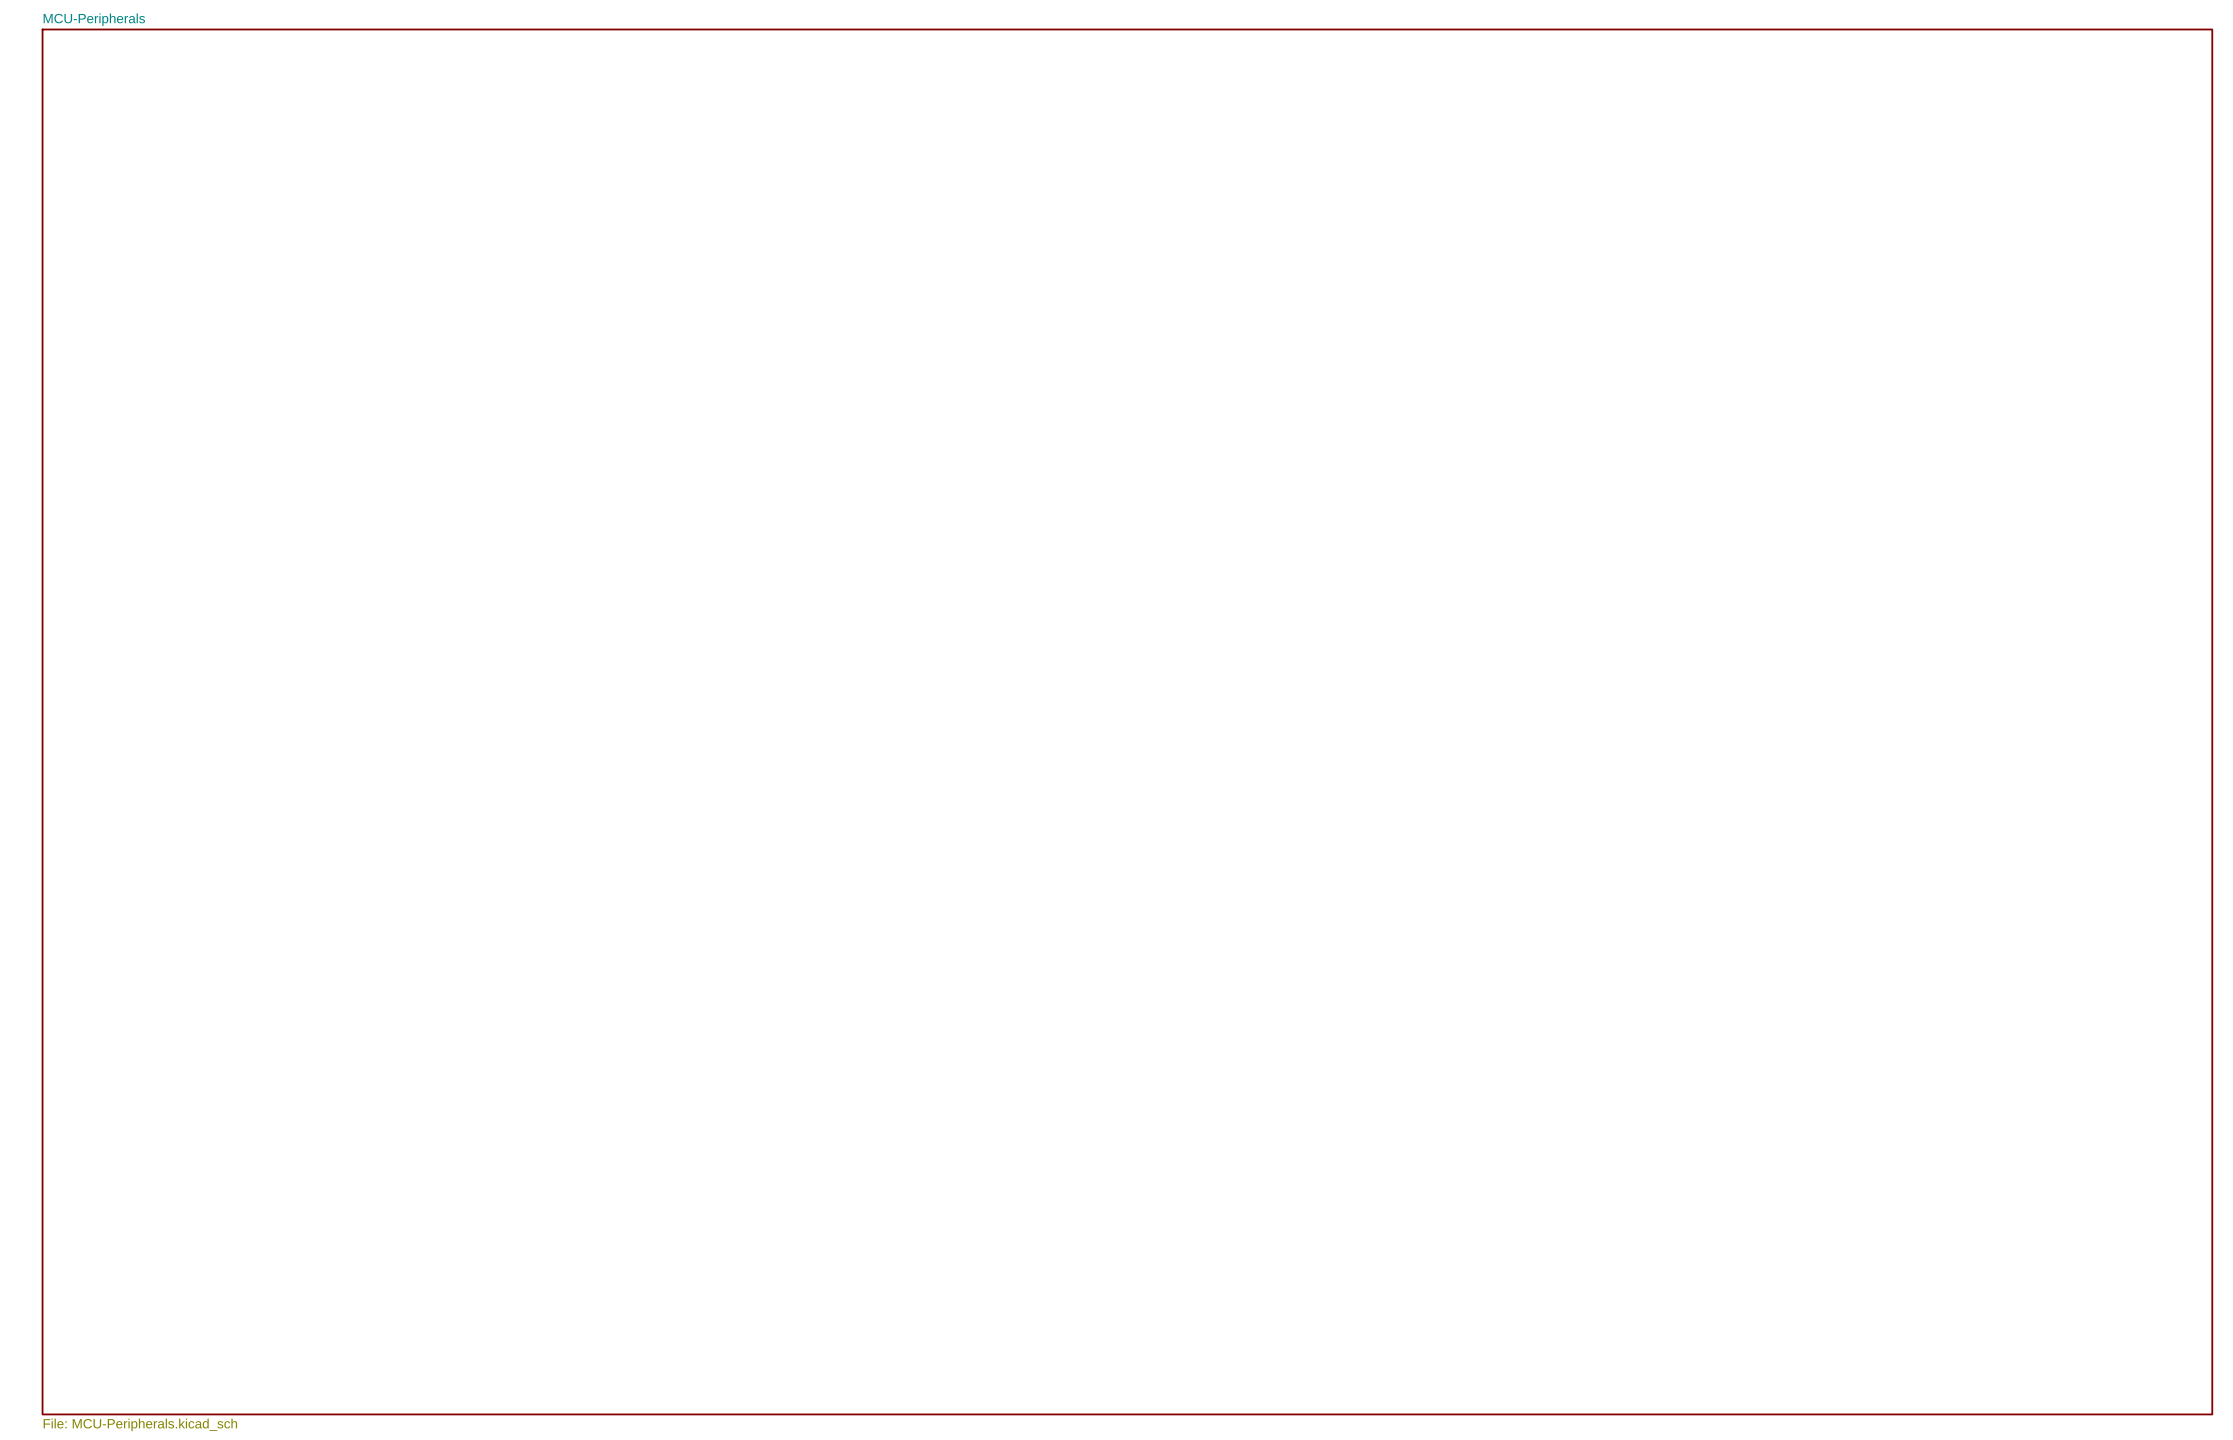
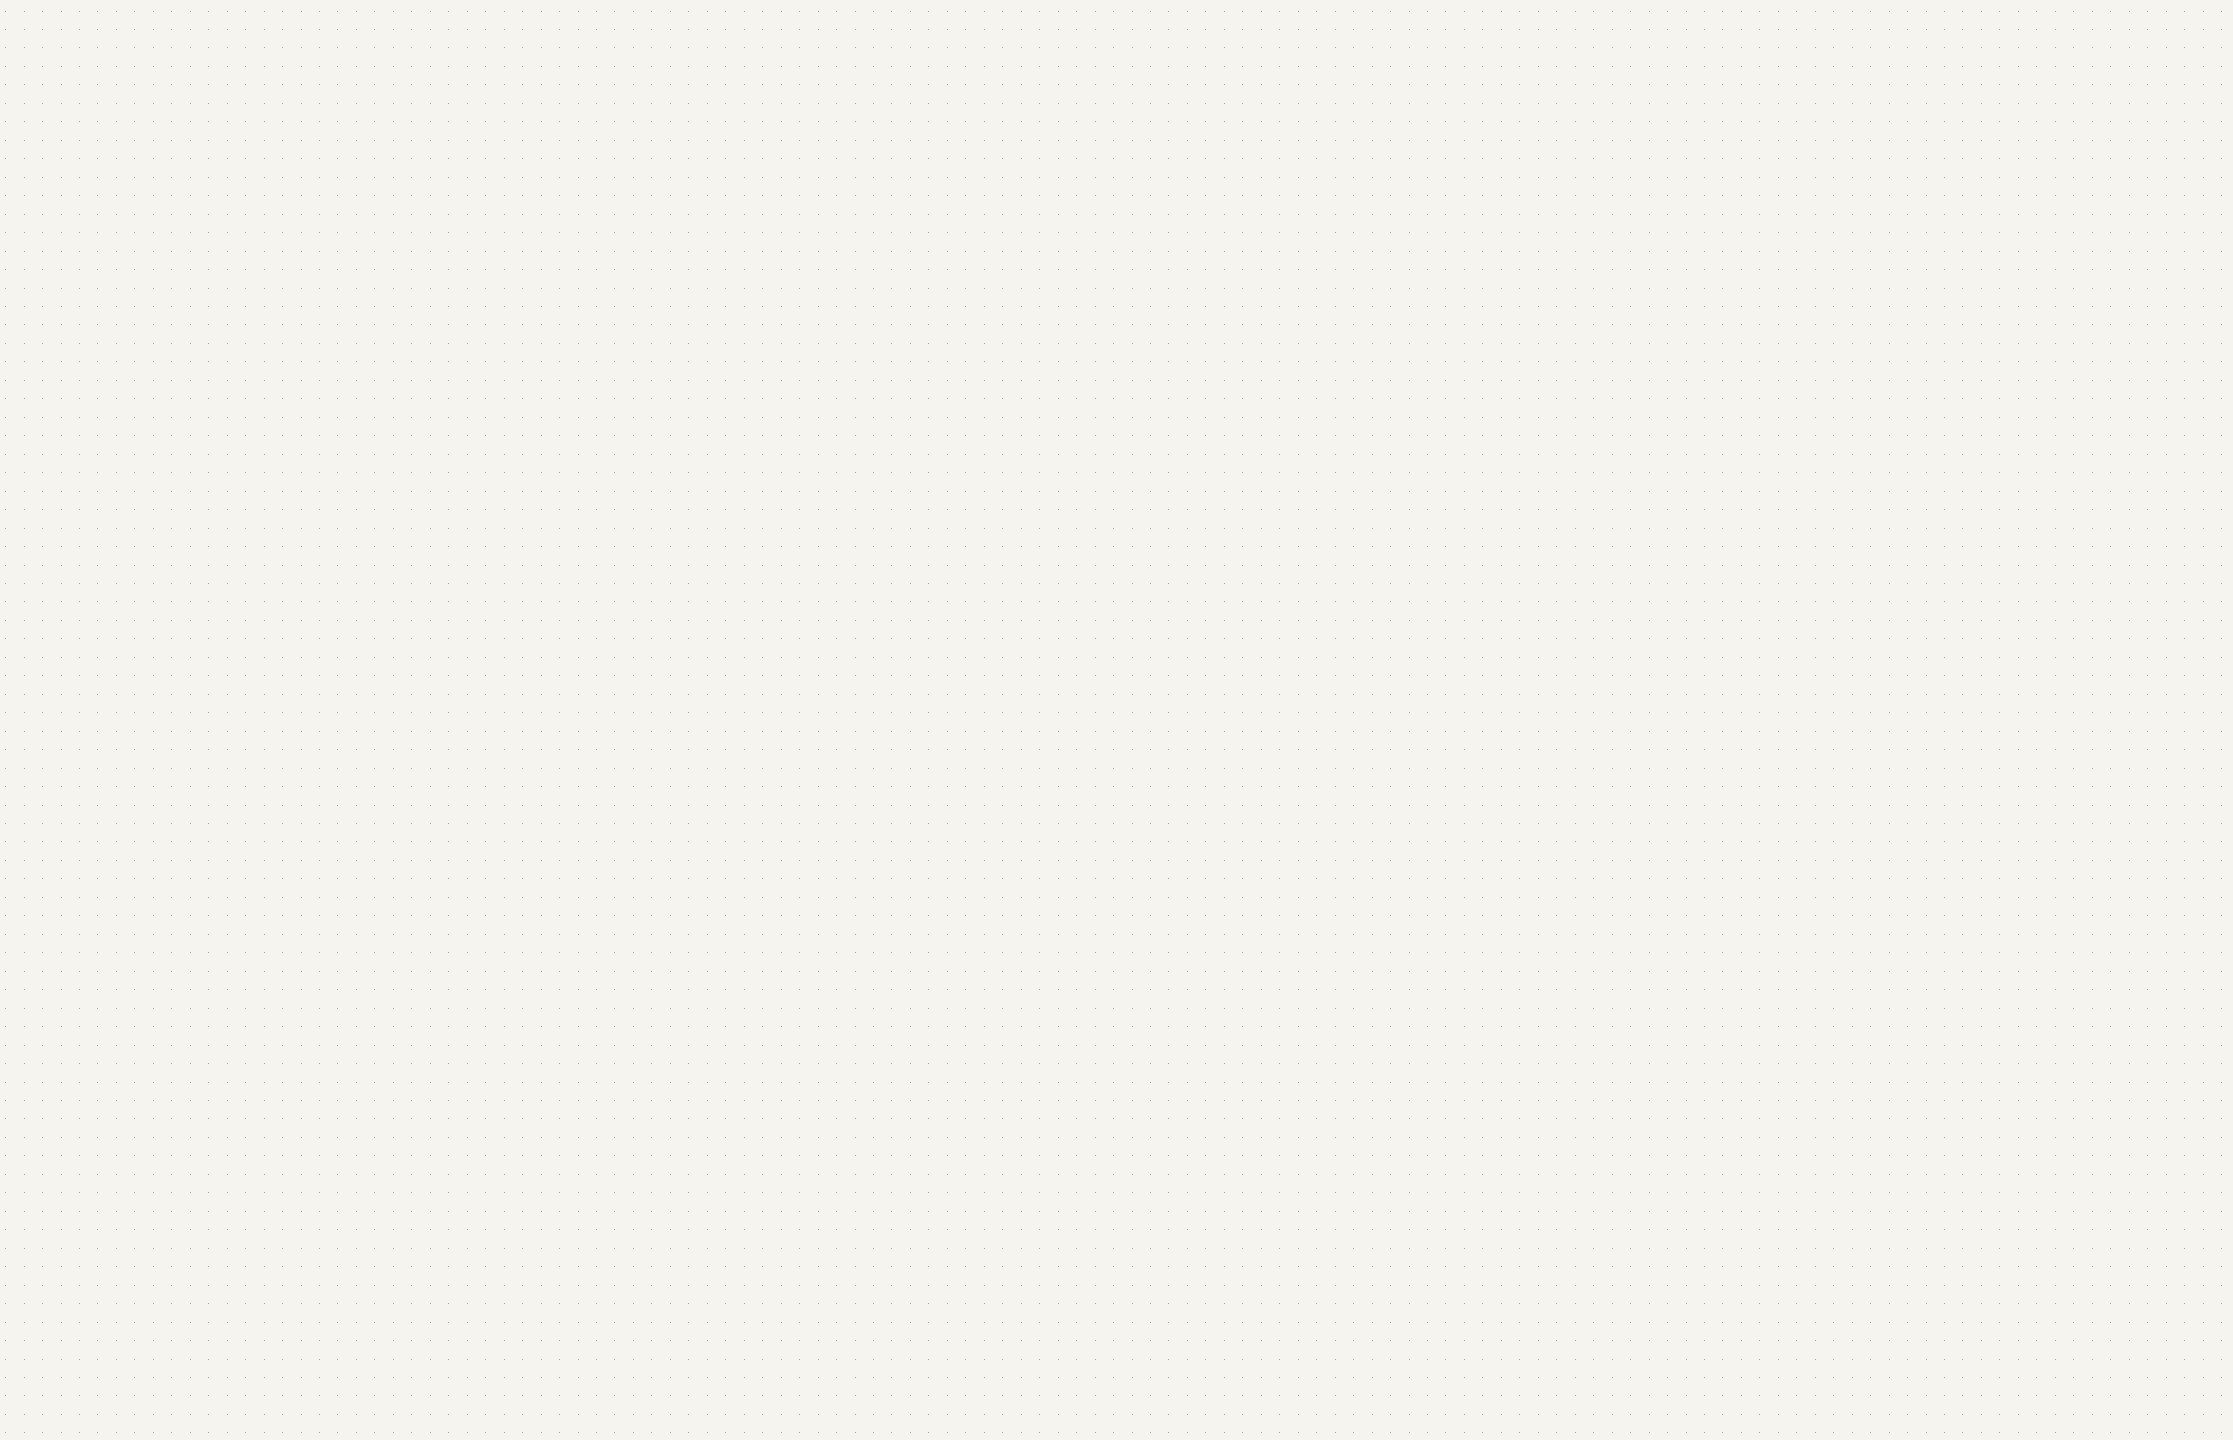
sheet MCU-Peripherals: File: MCU-Peripherals.kicad_sch (1127, 721) -> none

